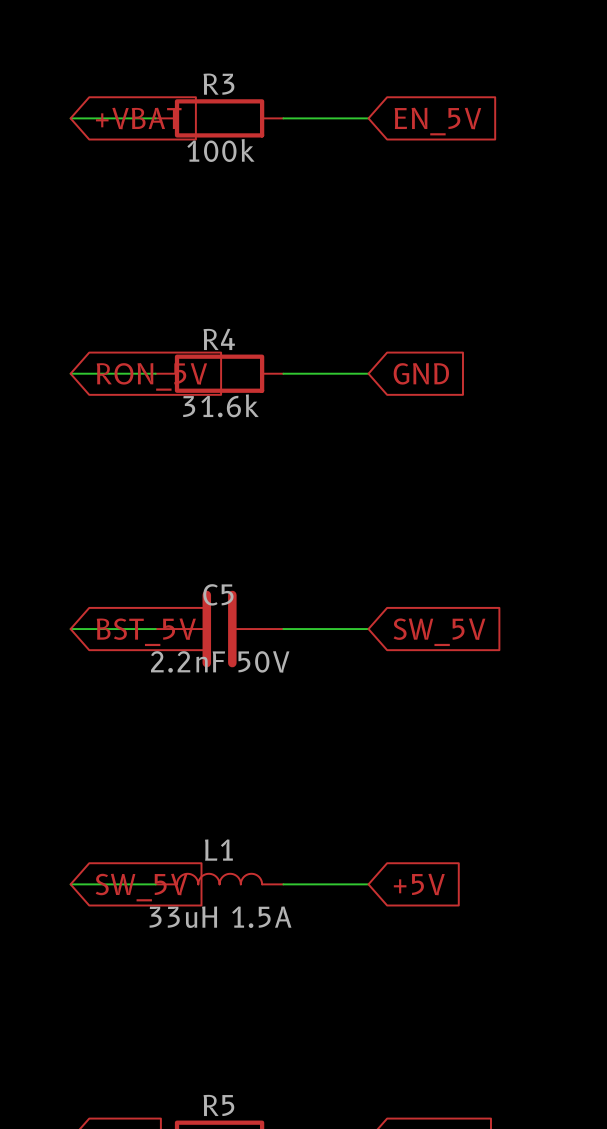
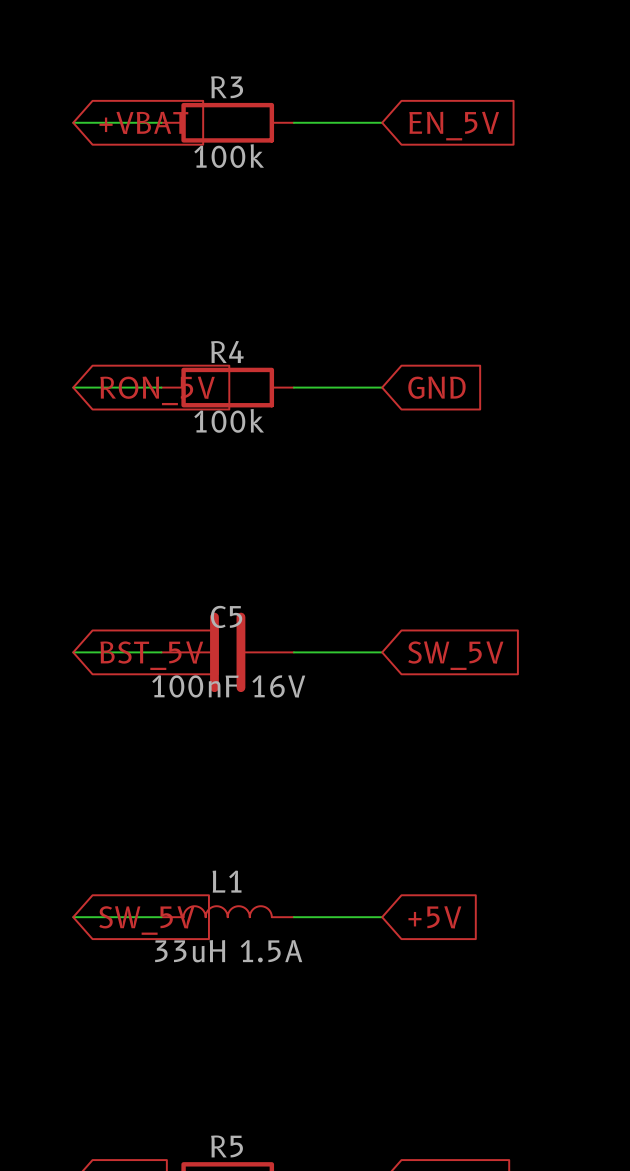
R4 value: 31.6k (220, 405) -> 100k (229, 420)
C5 value: 2.2nF 50V (220, 661) -> 100nF 16V (228, 686)

